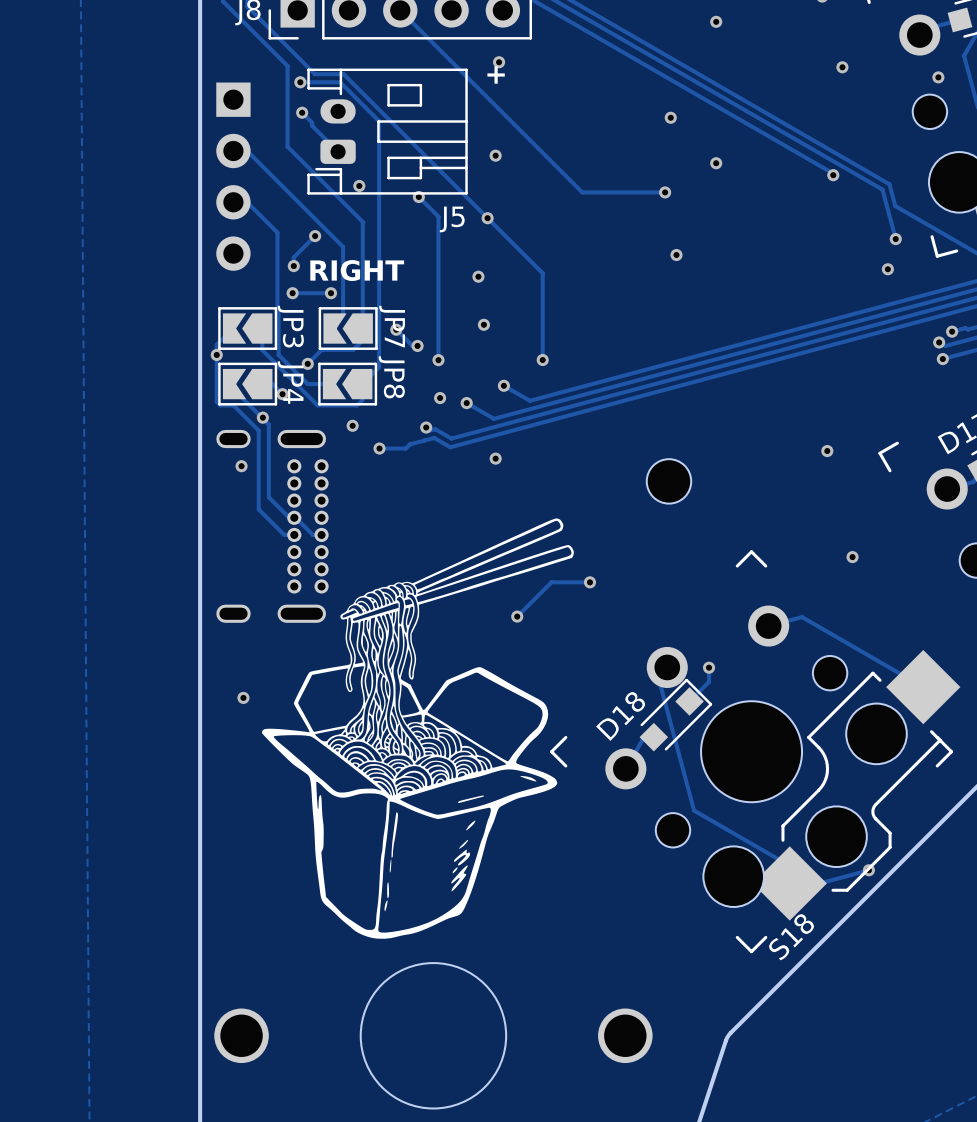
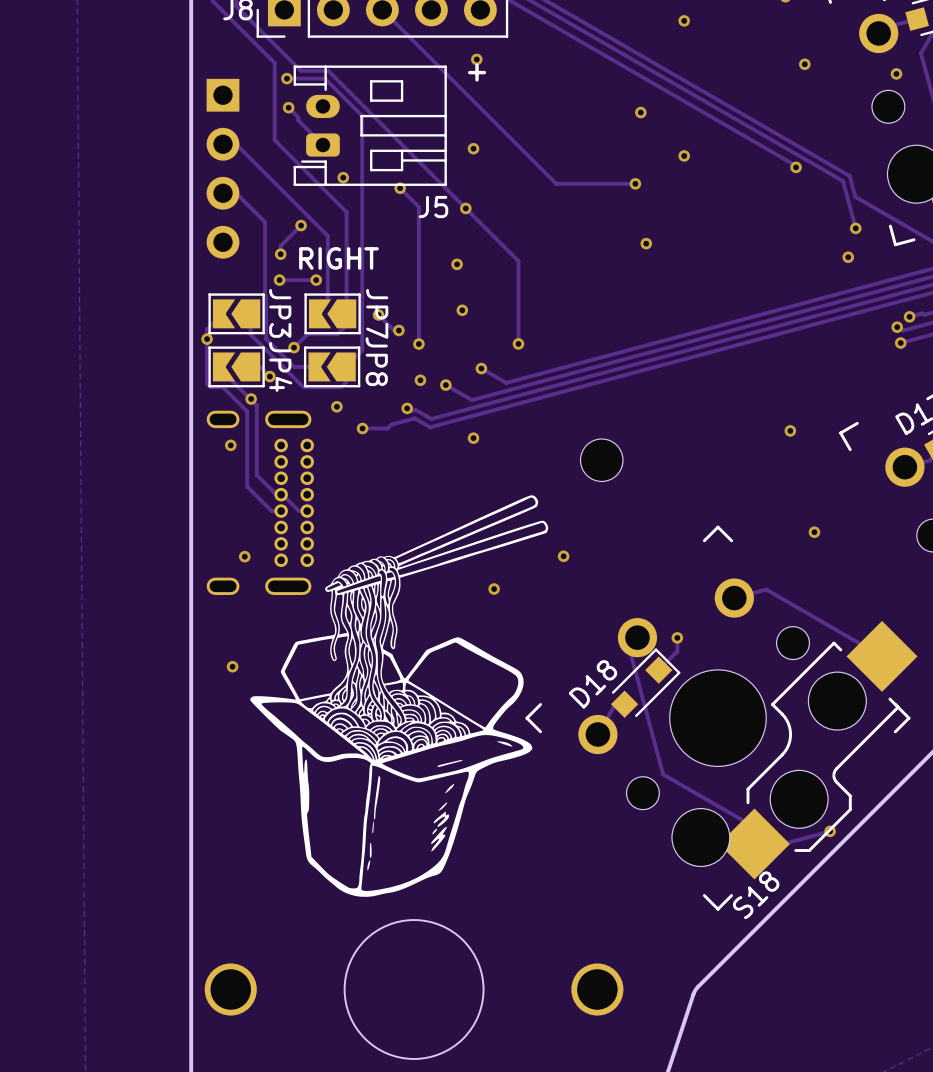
part position: (668, 481) -> (601, 460)
via: none -> (244, 556)
track: (589, 582) (551, 582) (517, 616) -> none

